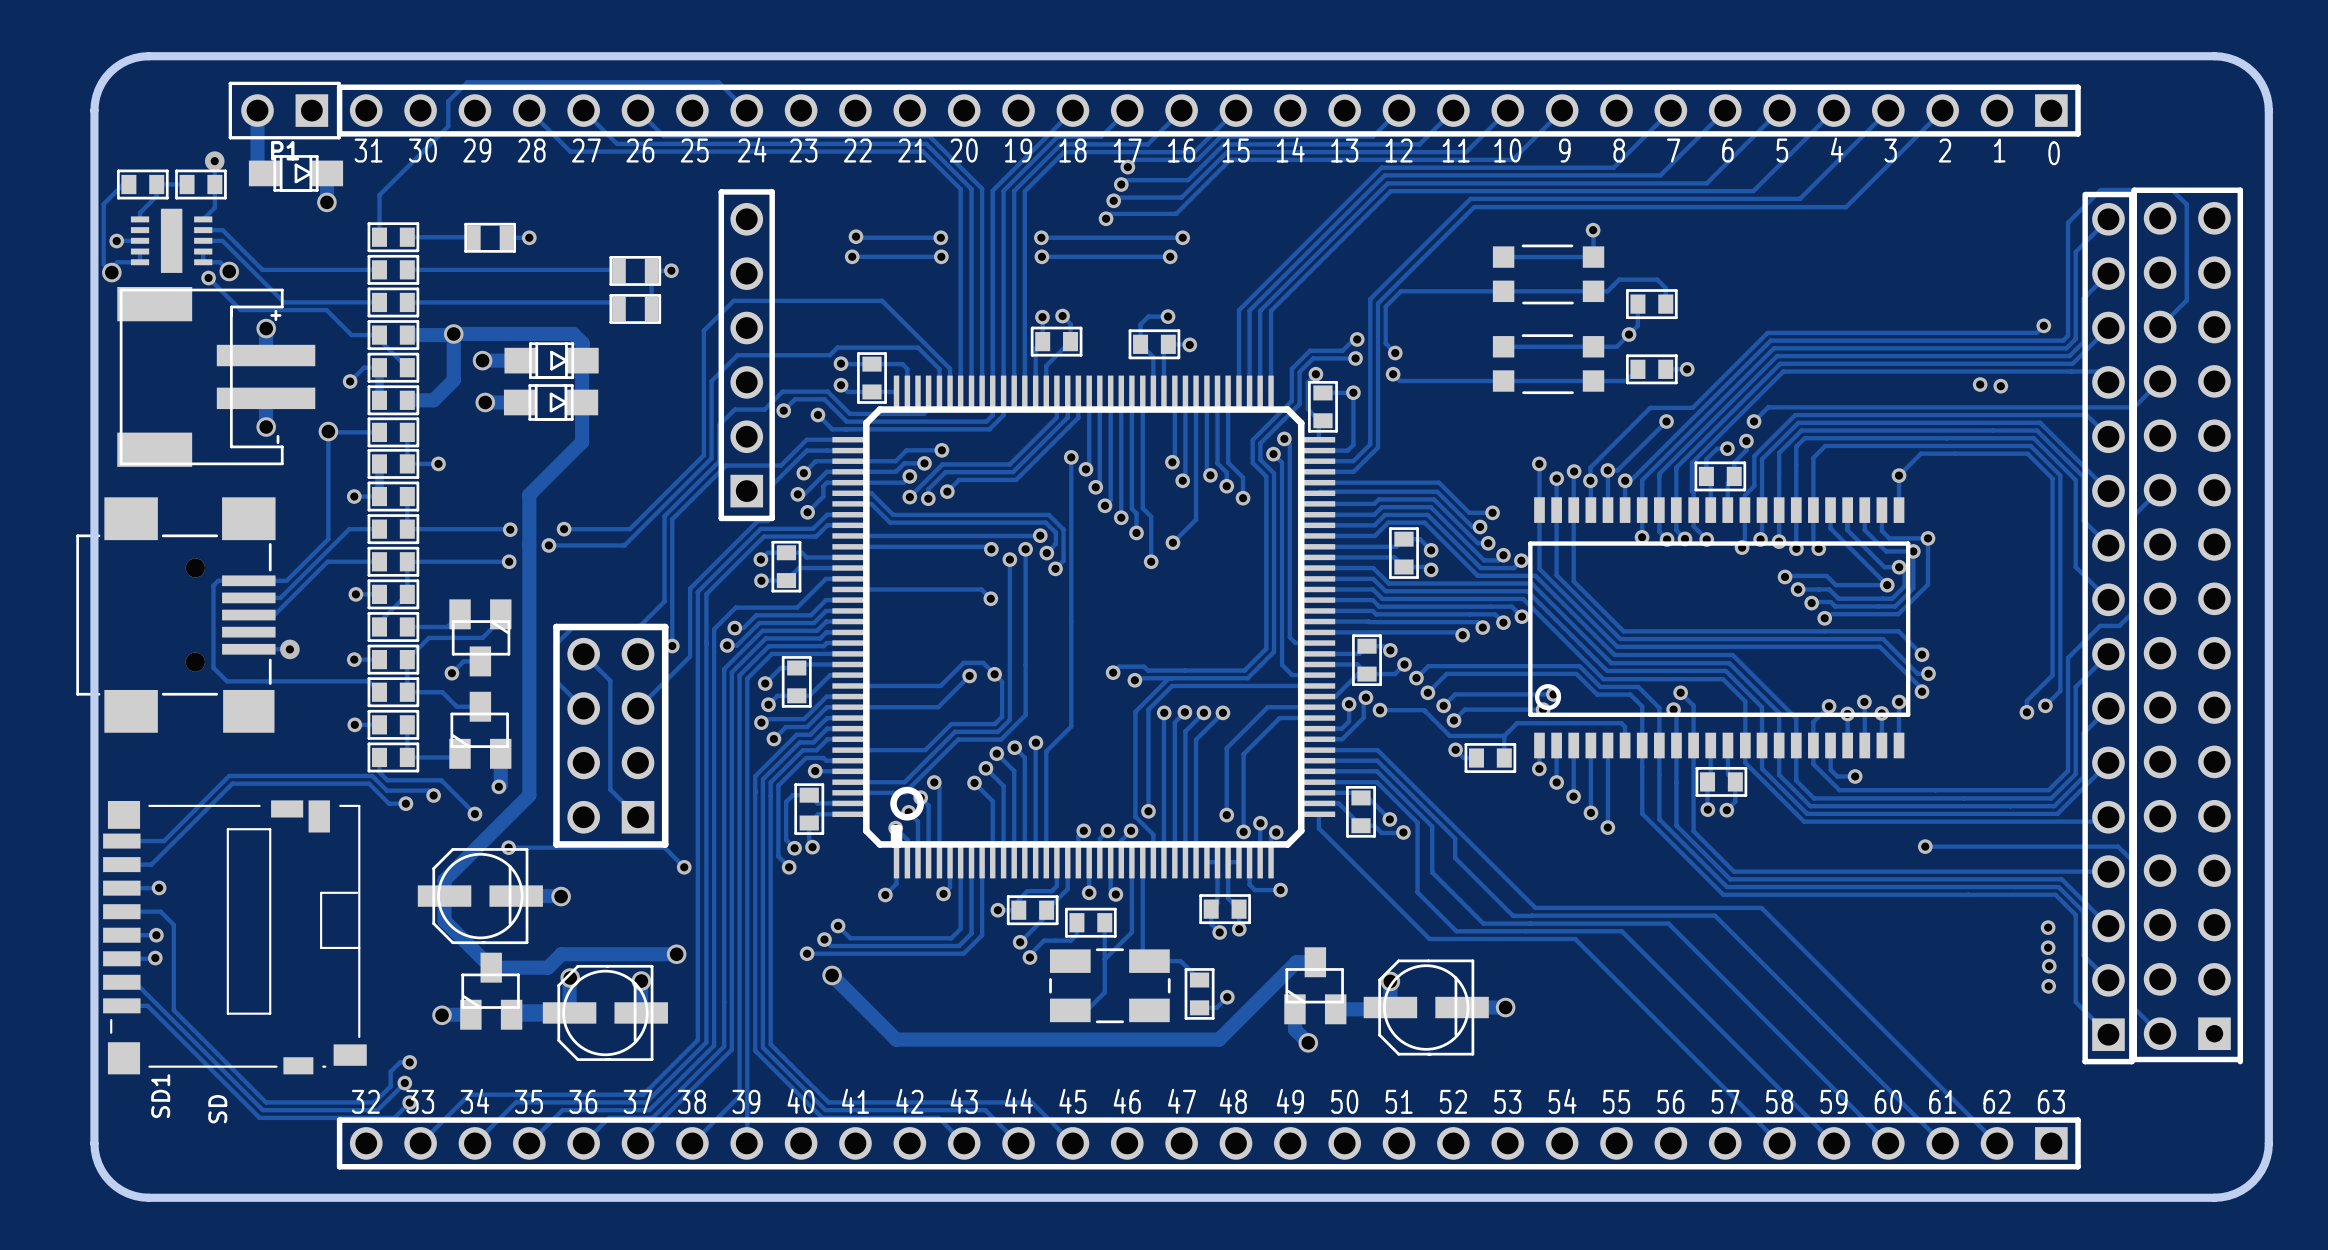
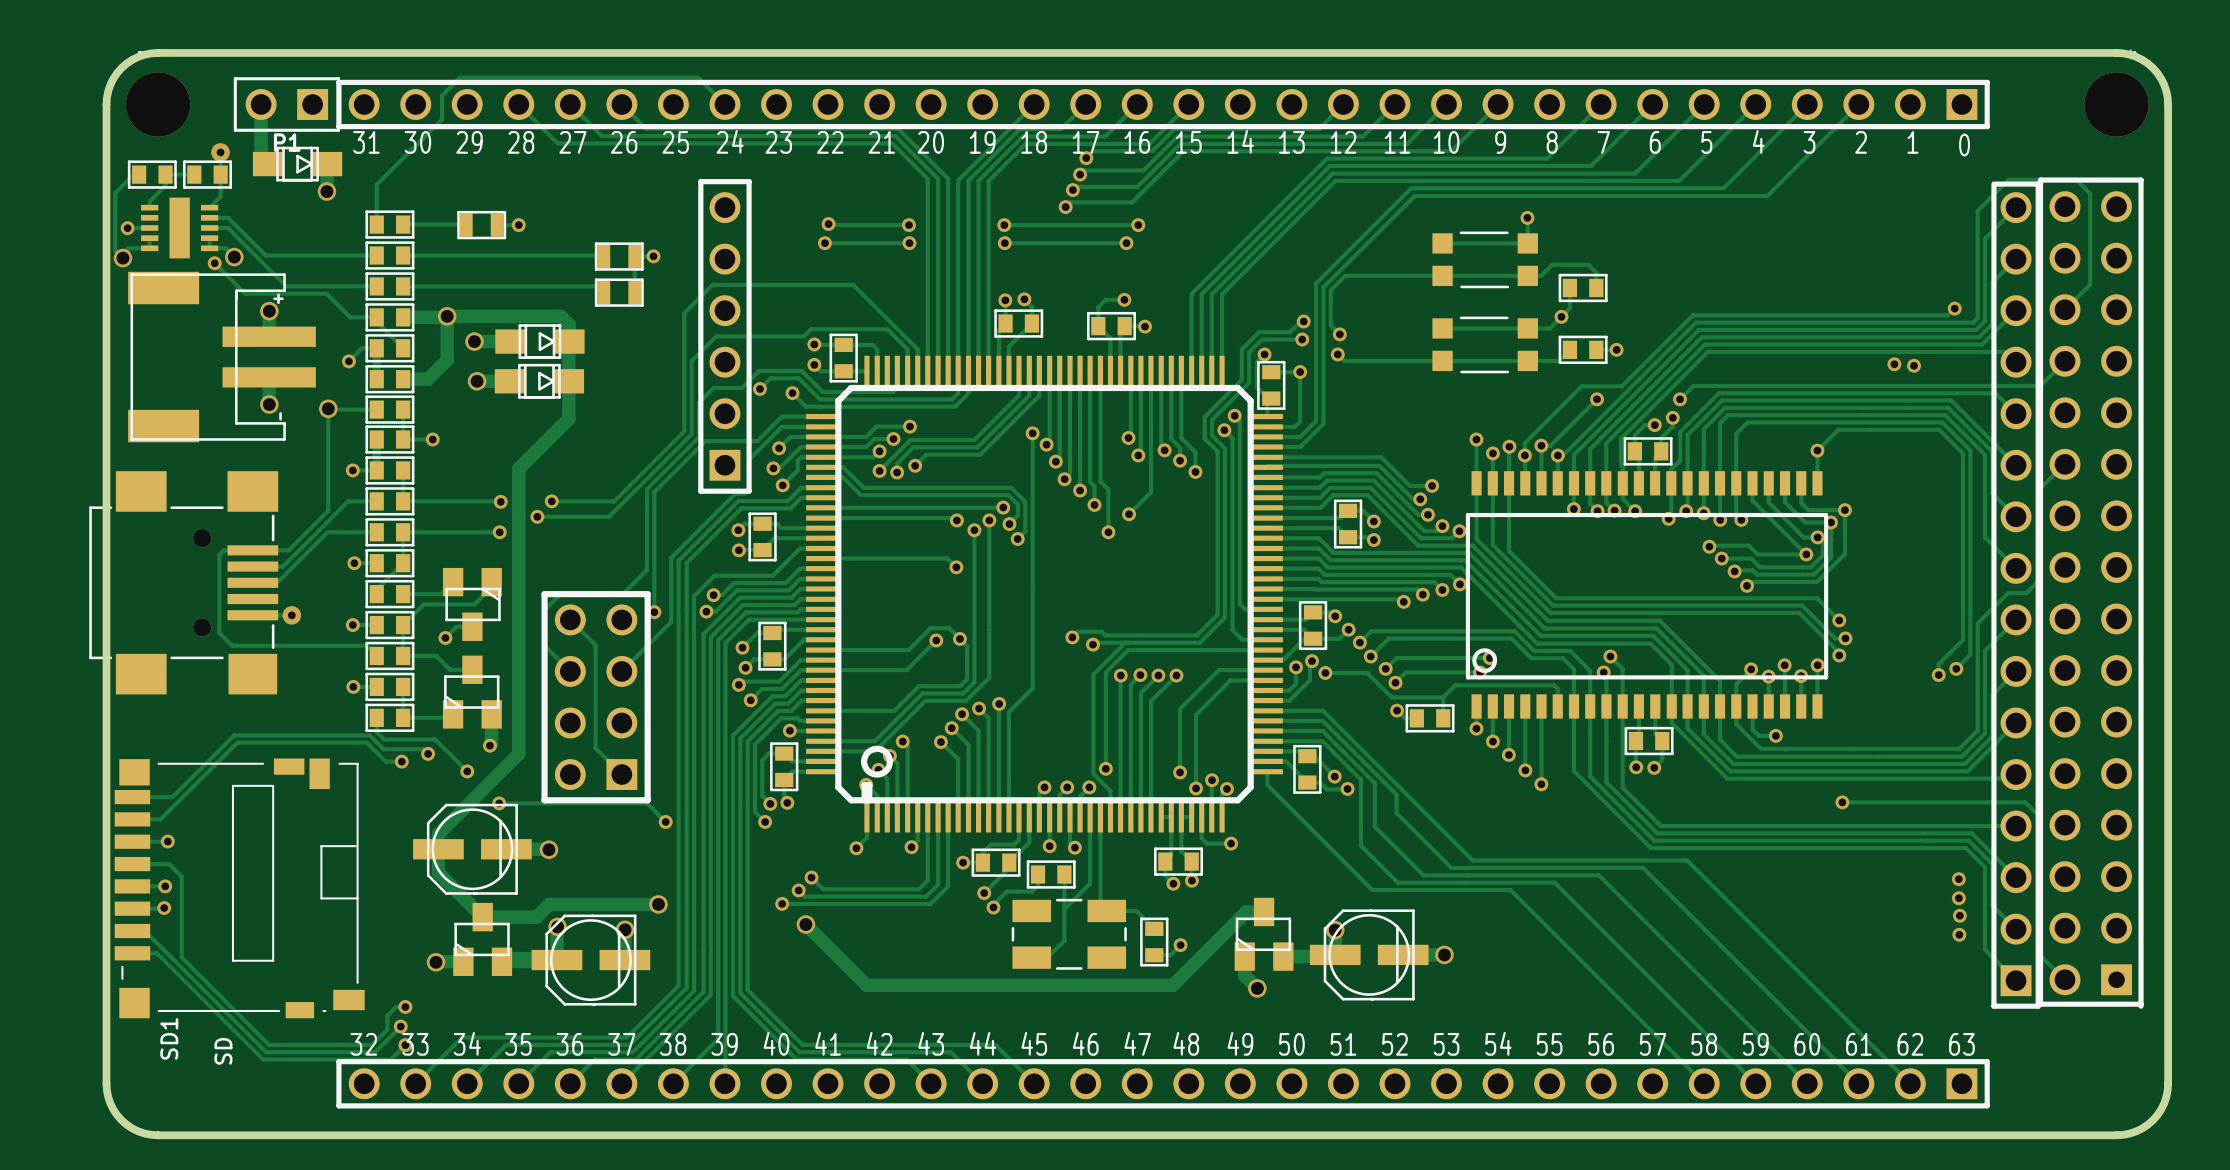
part: none -> (158, 104)
part: none -> (2116, 104)

